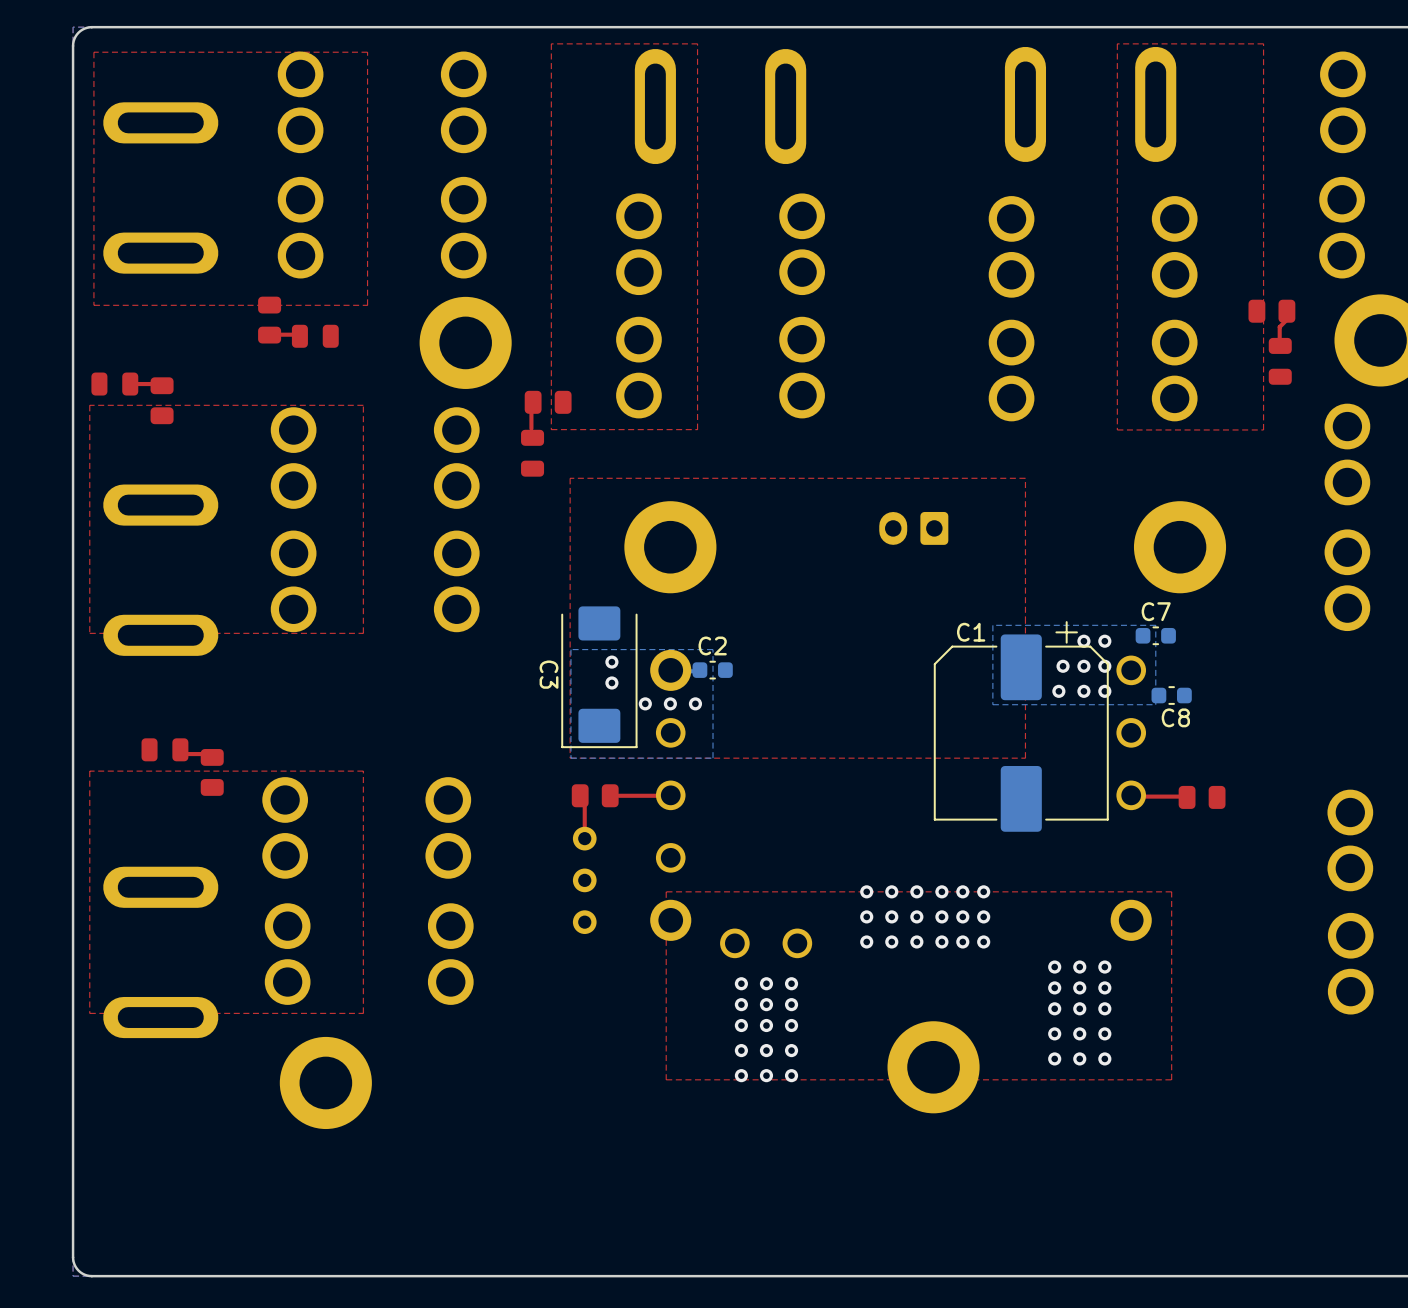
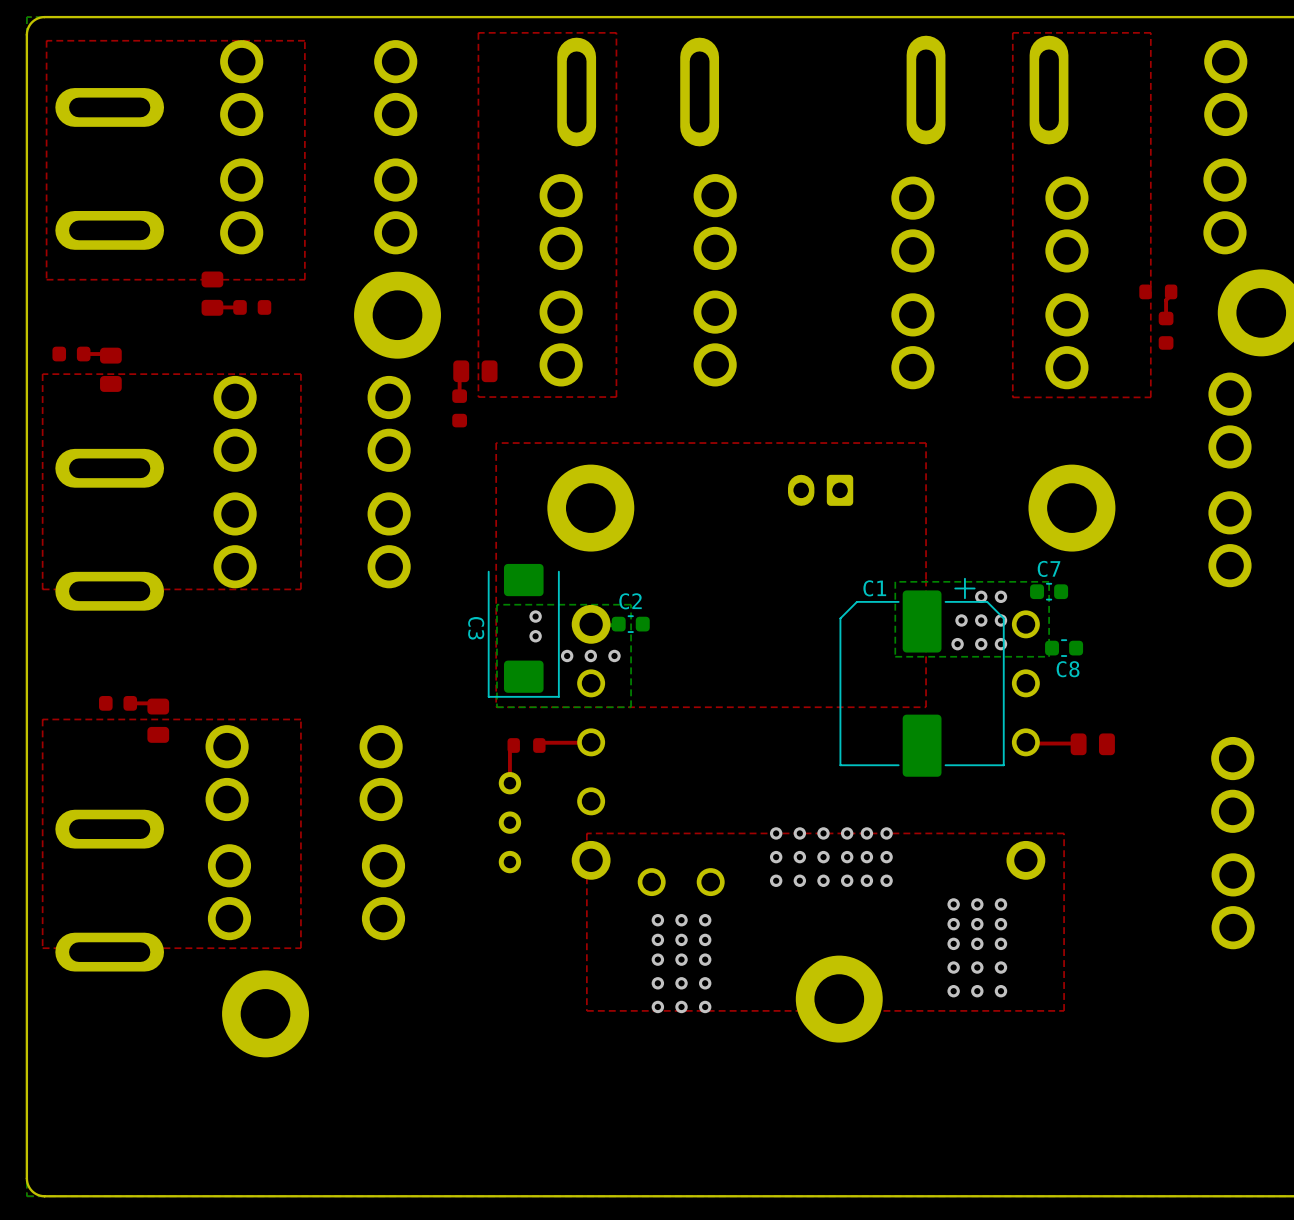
part footprint: [1248, 299, 1296, 323] -> [1139, 284, 1178, 300]
part footprint: [291, 324, 339, 348] -> [233, 300, 272, 315]
part footprint: [1268, 337, 1292, 385] -> [1158, 311, 1174, 350]
part footprint: [91, 372, 139, 396] -> [52, 346, 91, 362]
part footprint: [521, 429, 545, 477] -> [452, 389, 467, 428]
part footprint: [141, 738, 189, 762] -> [99, 695, 138, 711]
part footprint: [571, 784, 619, 808] -> [507, 738, 546, 753]

